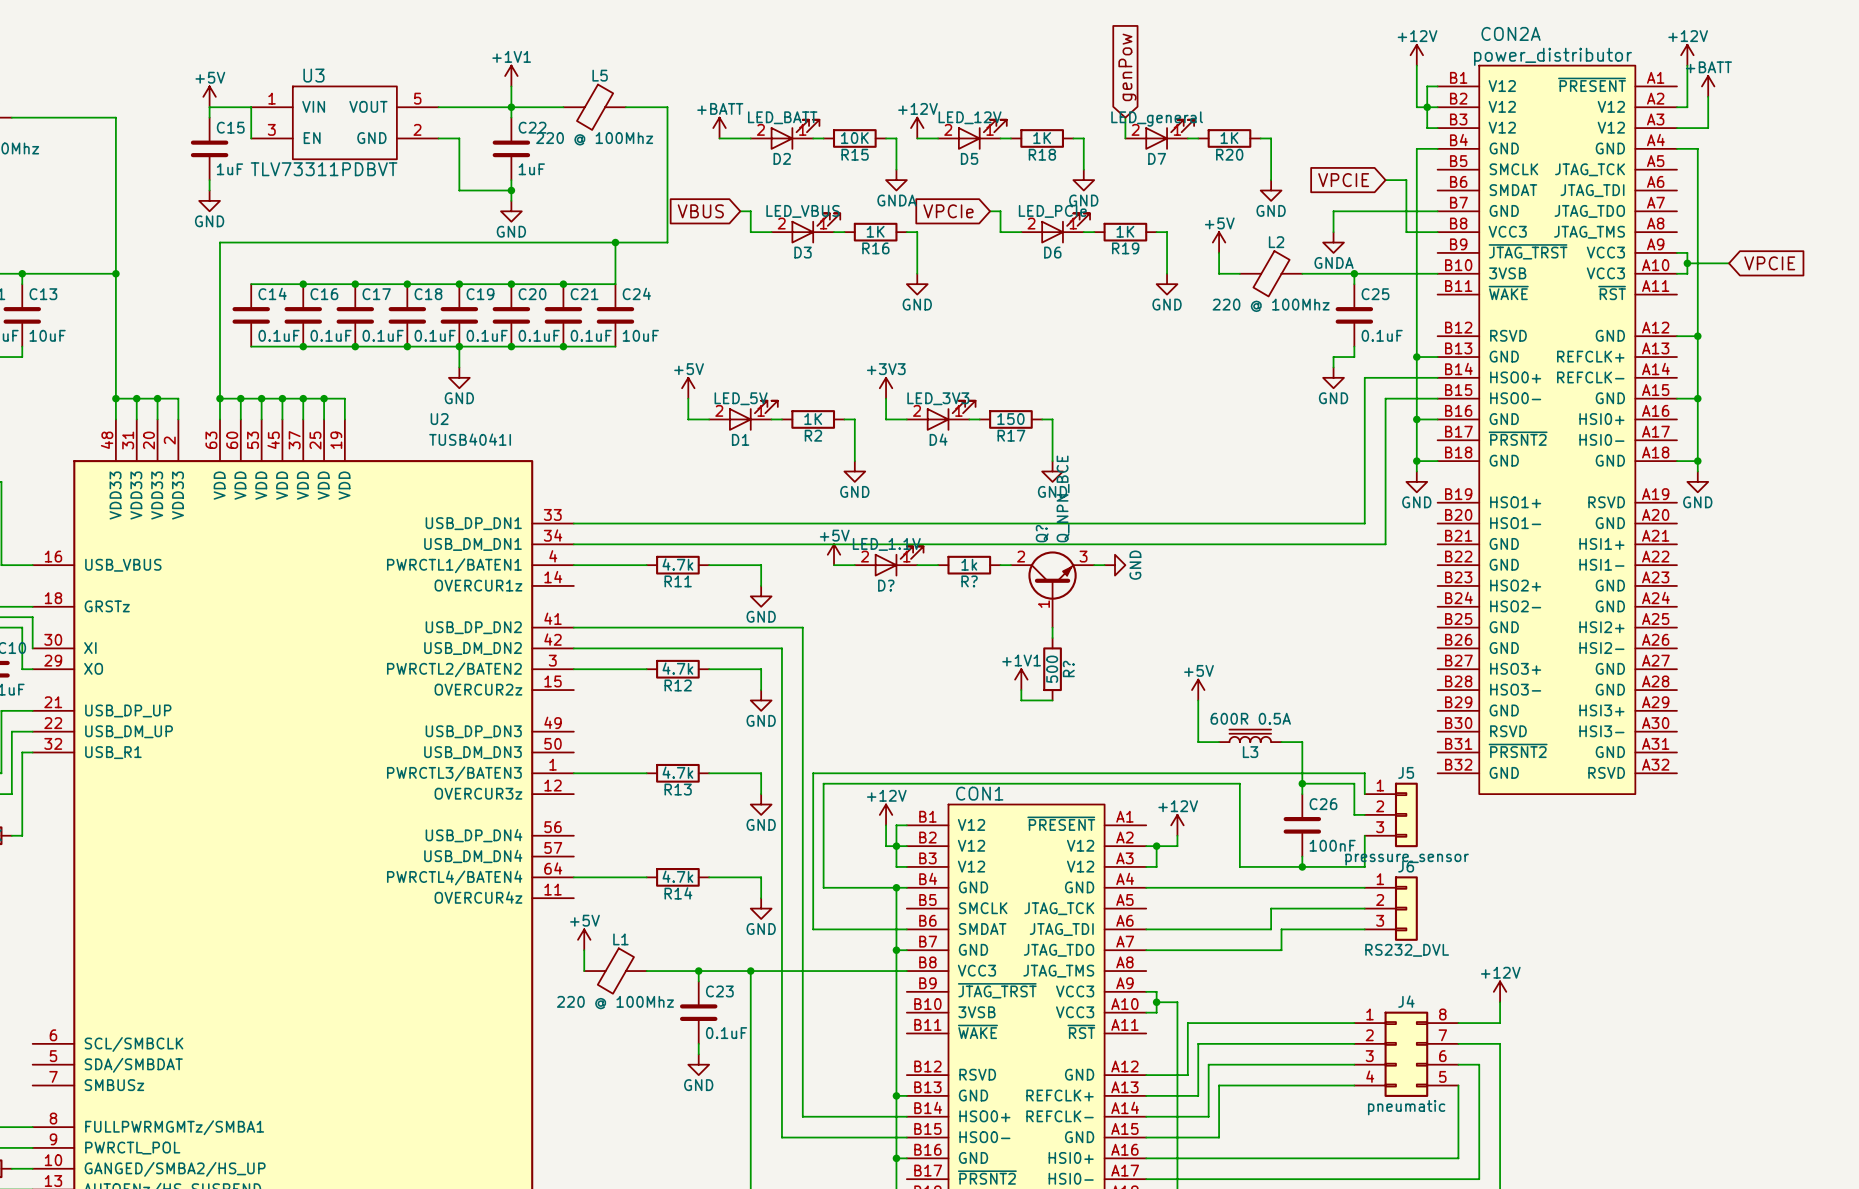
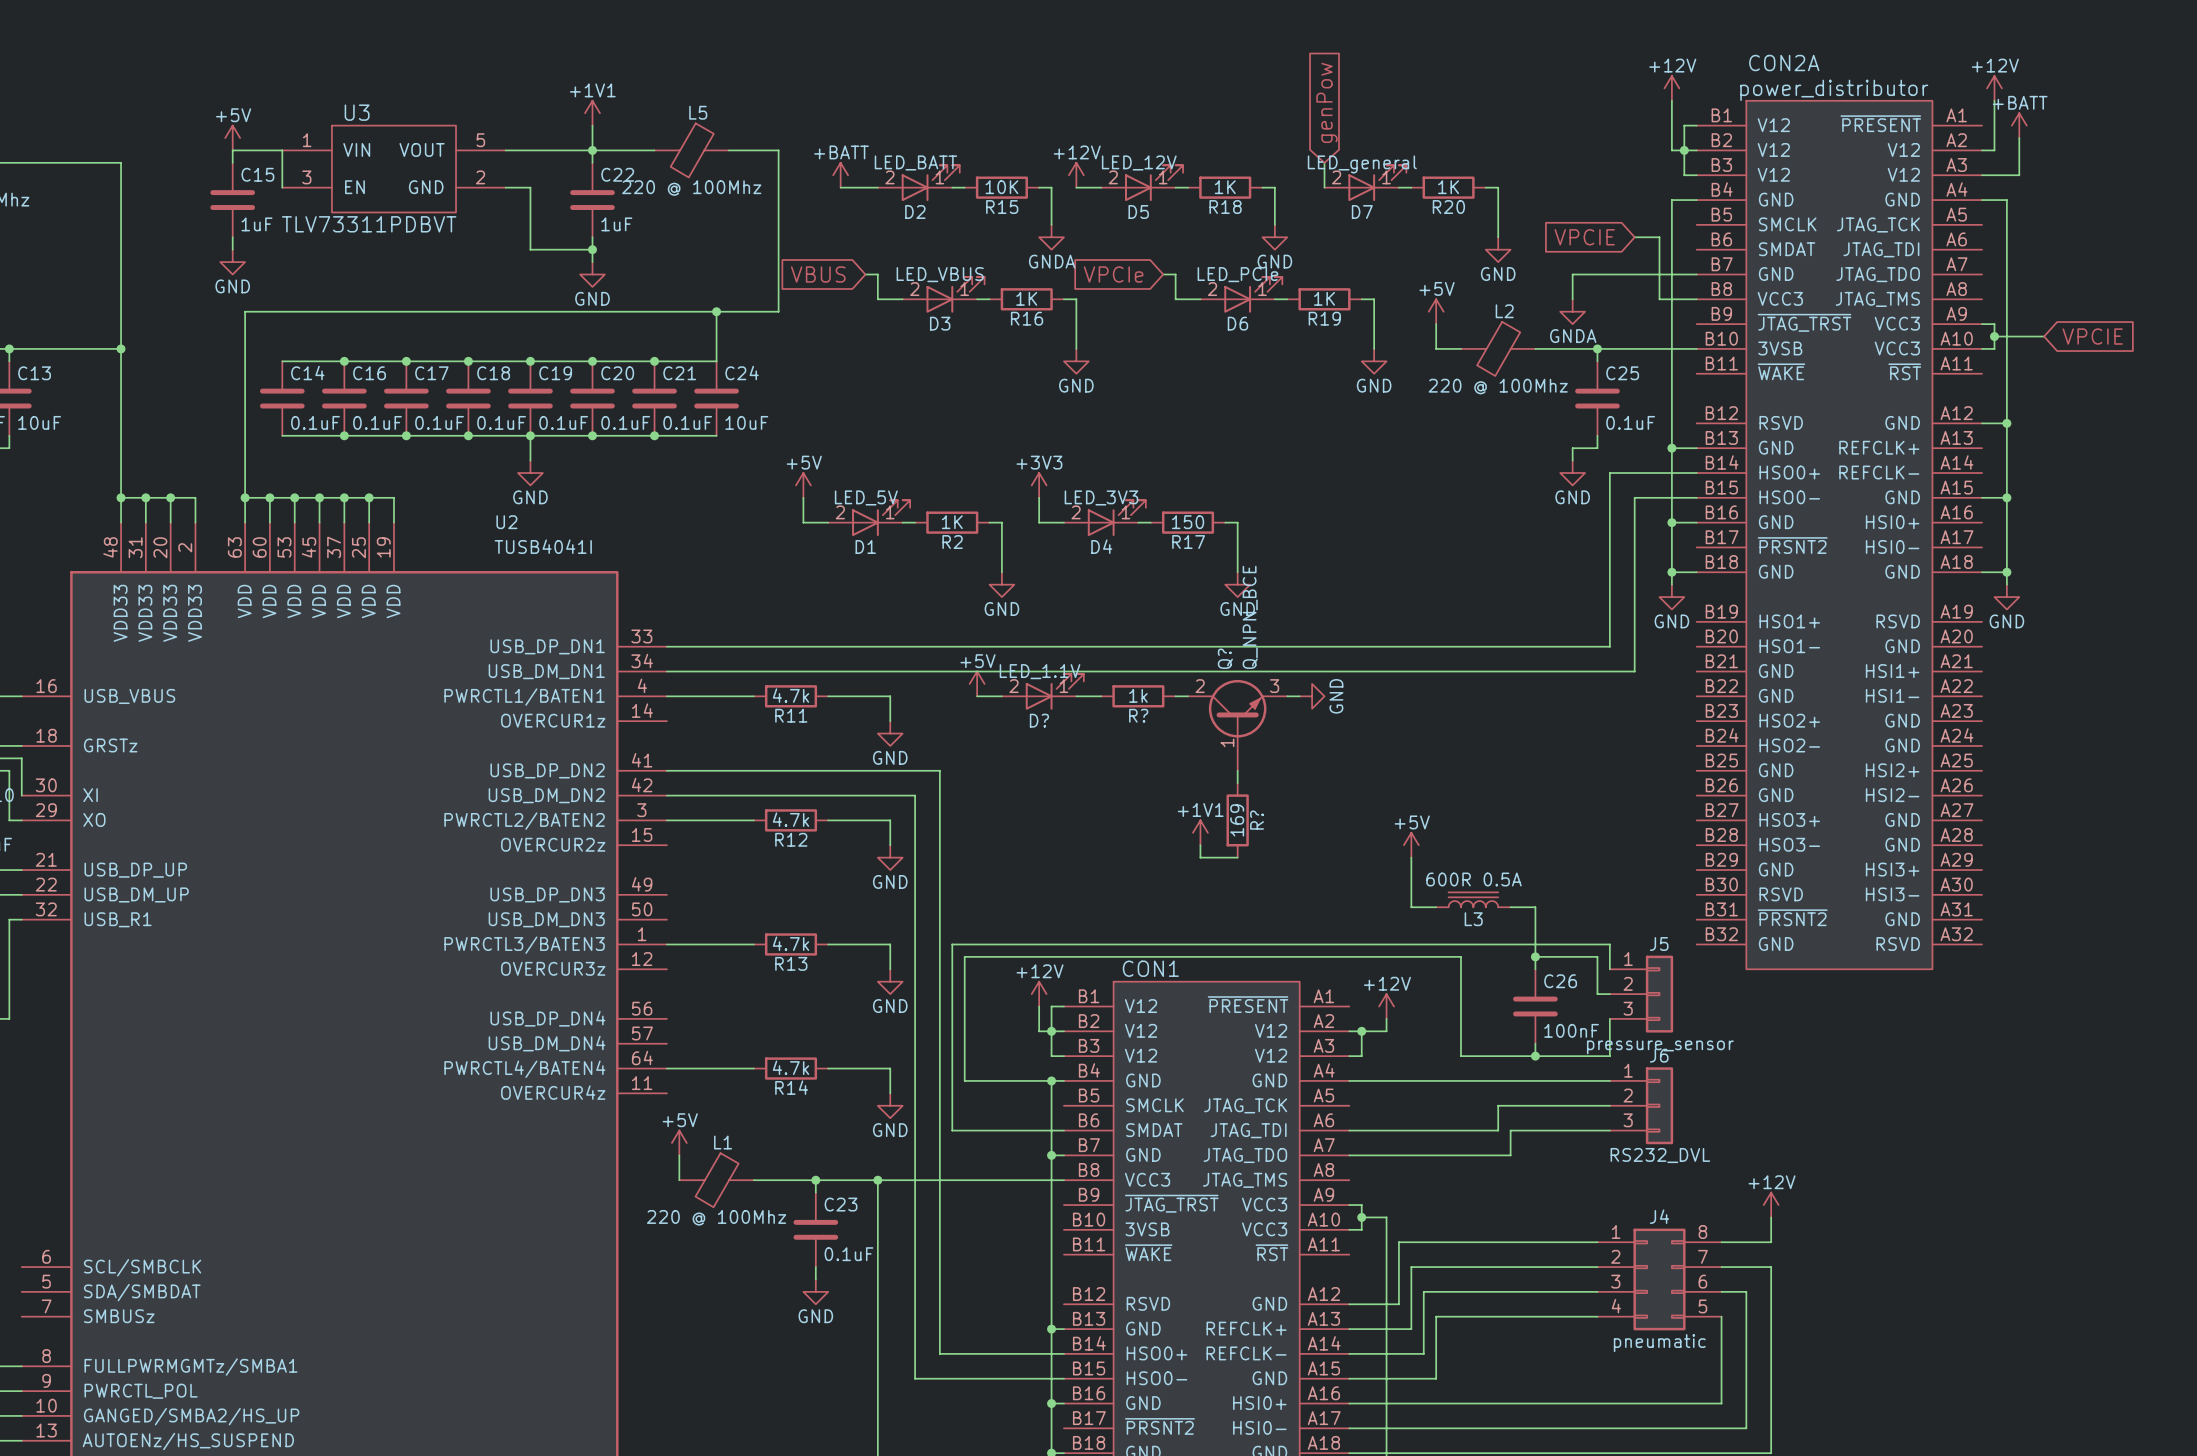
R? value: 500 (1052, 669) -> 169 (1237, 820)

